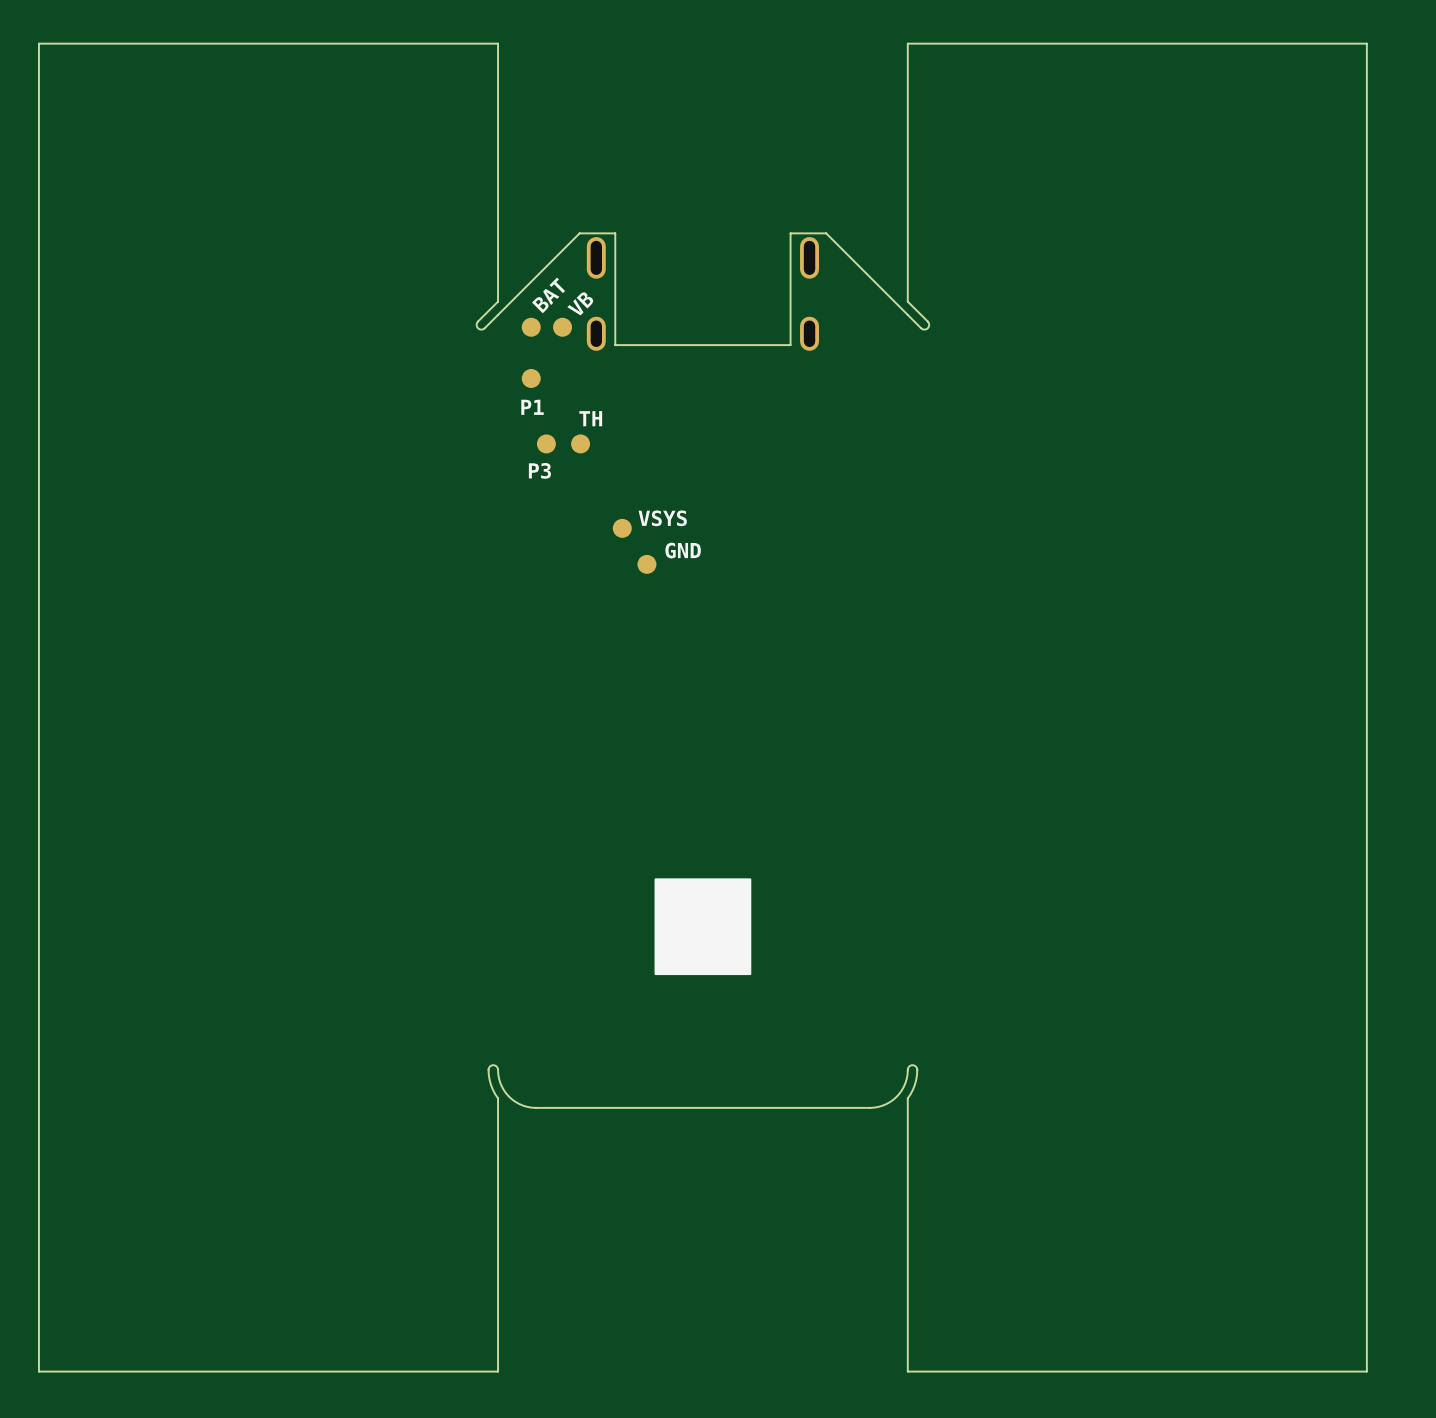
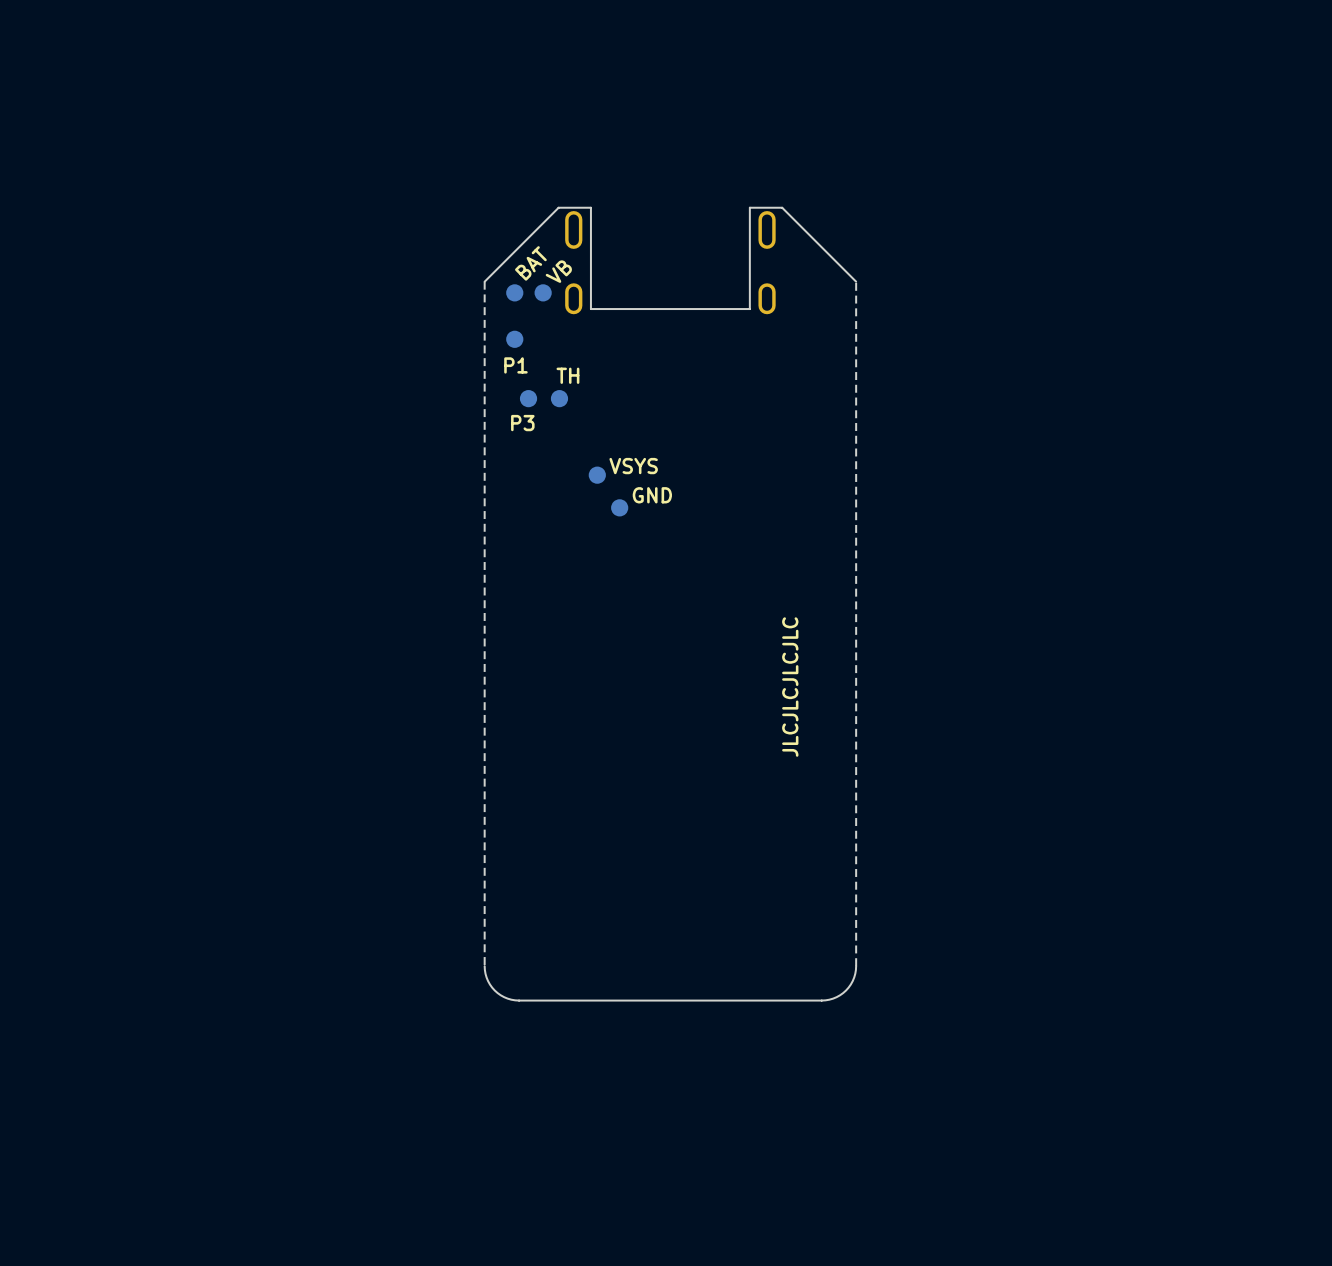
board edge: (498, 314) (483, 328) (477, 327) (477, 321) (498, 301) (498, 43) (38, 43) (38, 1371) (498, 1371) (498, 1098) (490, 1084) (488, 1069) (493, 1065) (498, 1069) -> (484, 281) (484, 966)
board edge: (907, 314) (921, 328) (928, 327) (928, 321) (907, 301) (907, 43) (1366, 43) (1366, 1371) (907, 1371) (907, 1098) (914, 1084) (917, 1069) (912, 1065) (907, 1069) -> (856, 281) (856, 966)
text: none -> JLCJLCJLCJLC (790, 687)
drawing: [654, 878, 752, 976] -> none

